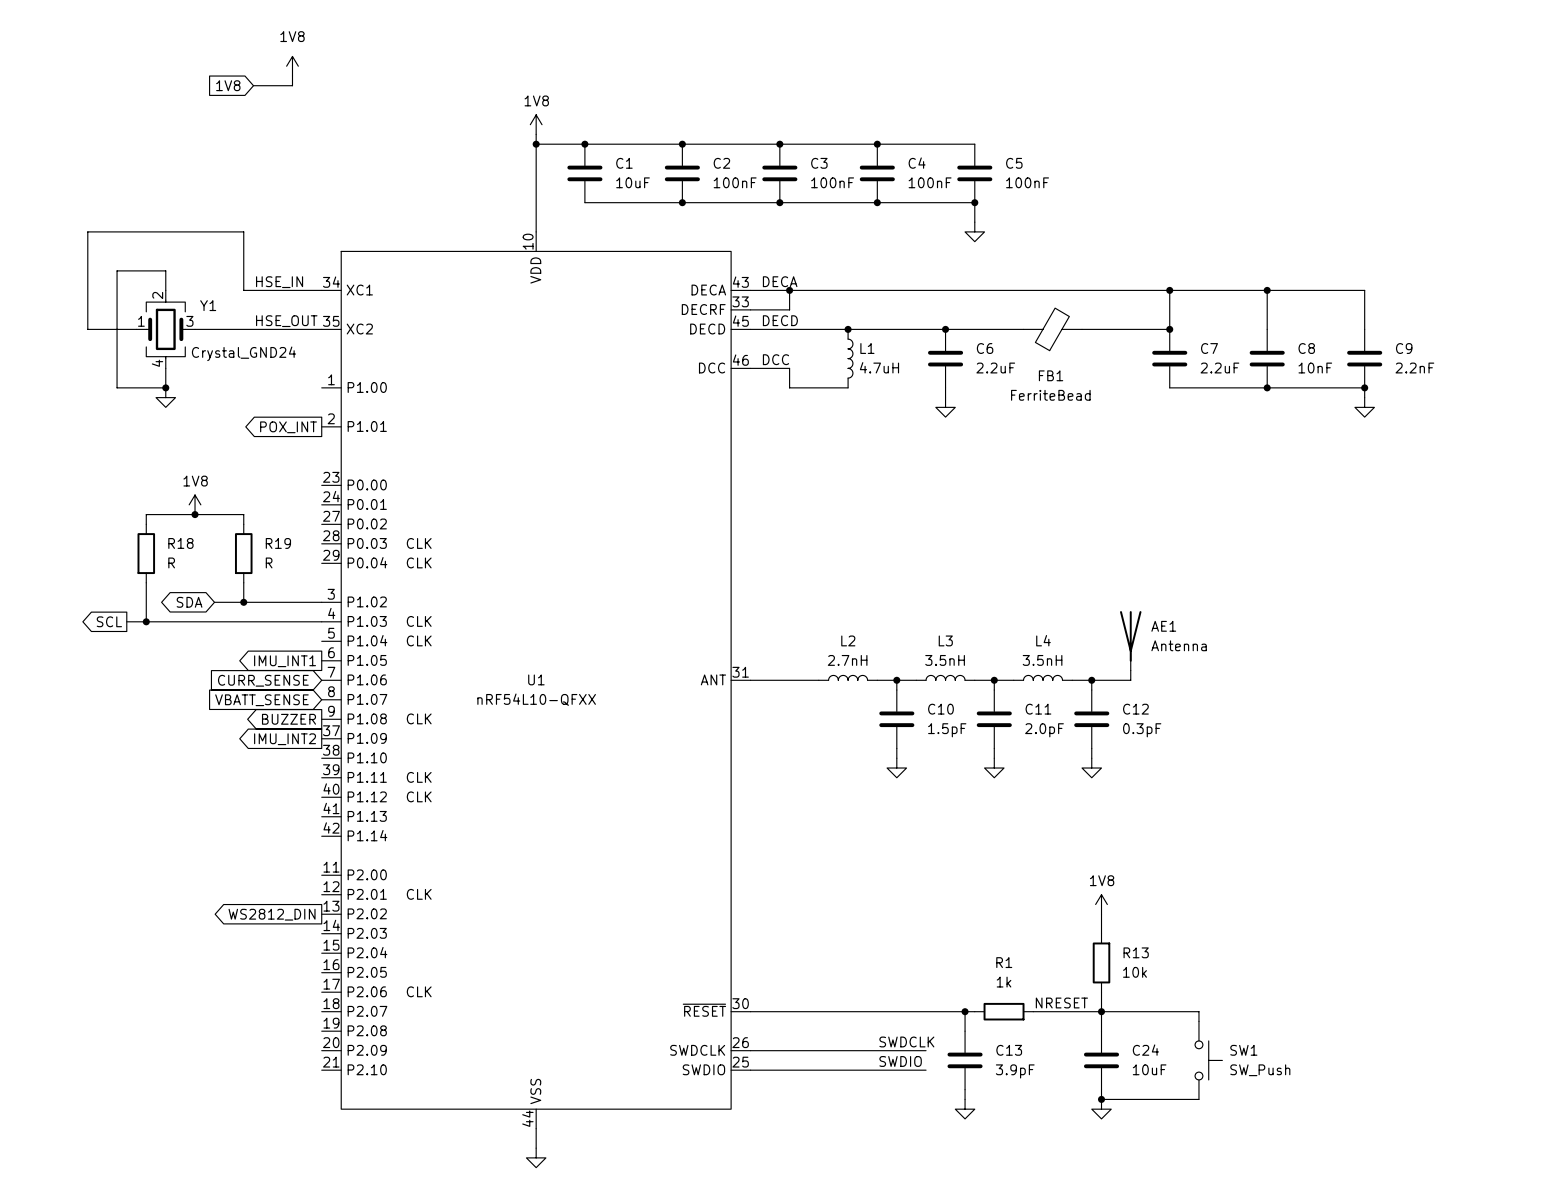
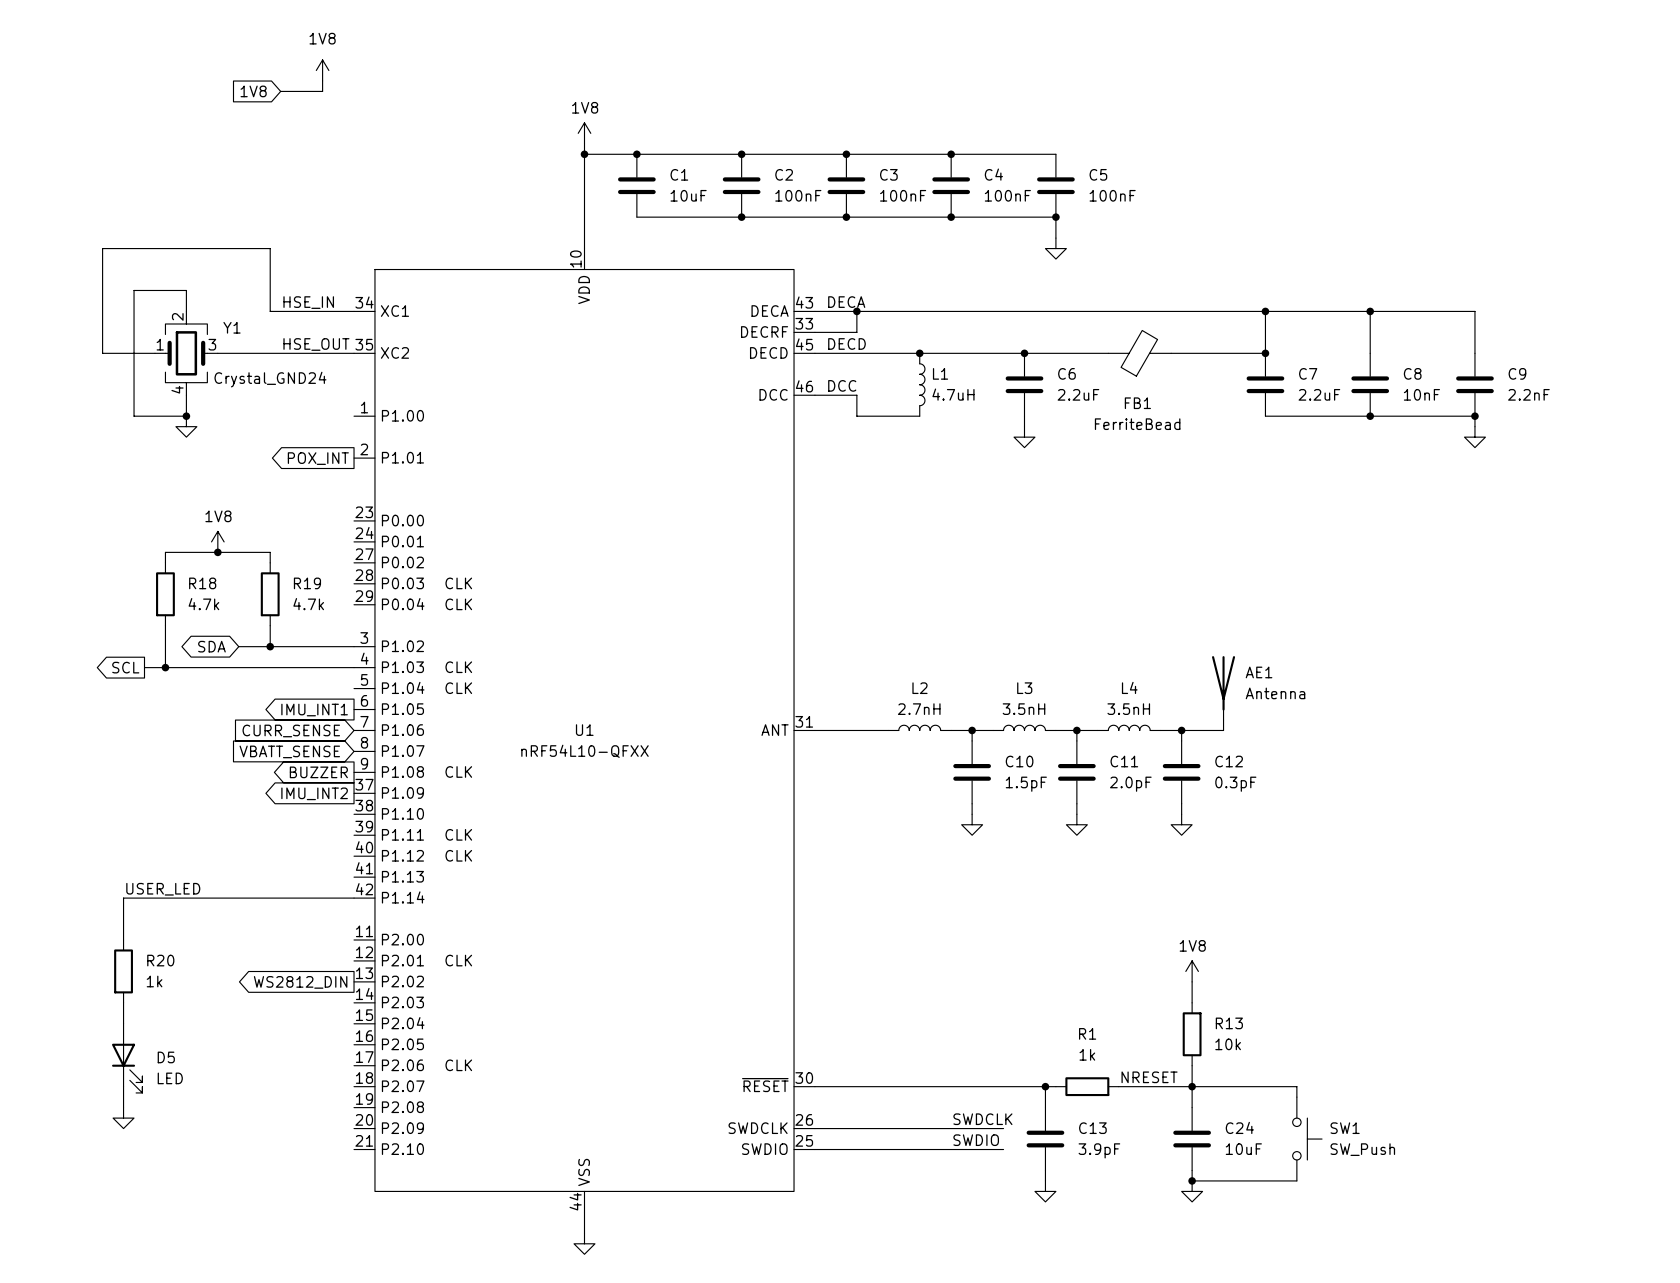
R18 value: R (171, 562) -> 4.7k (203, 604)
R19 value: R (269, 562) -> 4.7k (308, 604)
label: none -> USER_LED (163, 889)
wire: none -> (354, 898) (123, 898) (123, 939)
R20: none -> 1k (123, 971)
wire: none -> (123, 1002) (123, 1023)
D5: none -> LED (127, 1058)
wire: none -> (123, 1086) (123, 1107)
power symbol: none -> (123, 1118)

